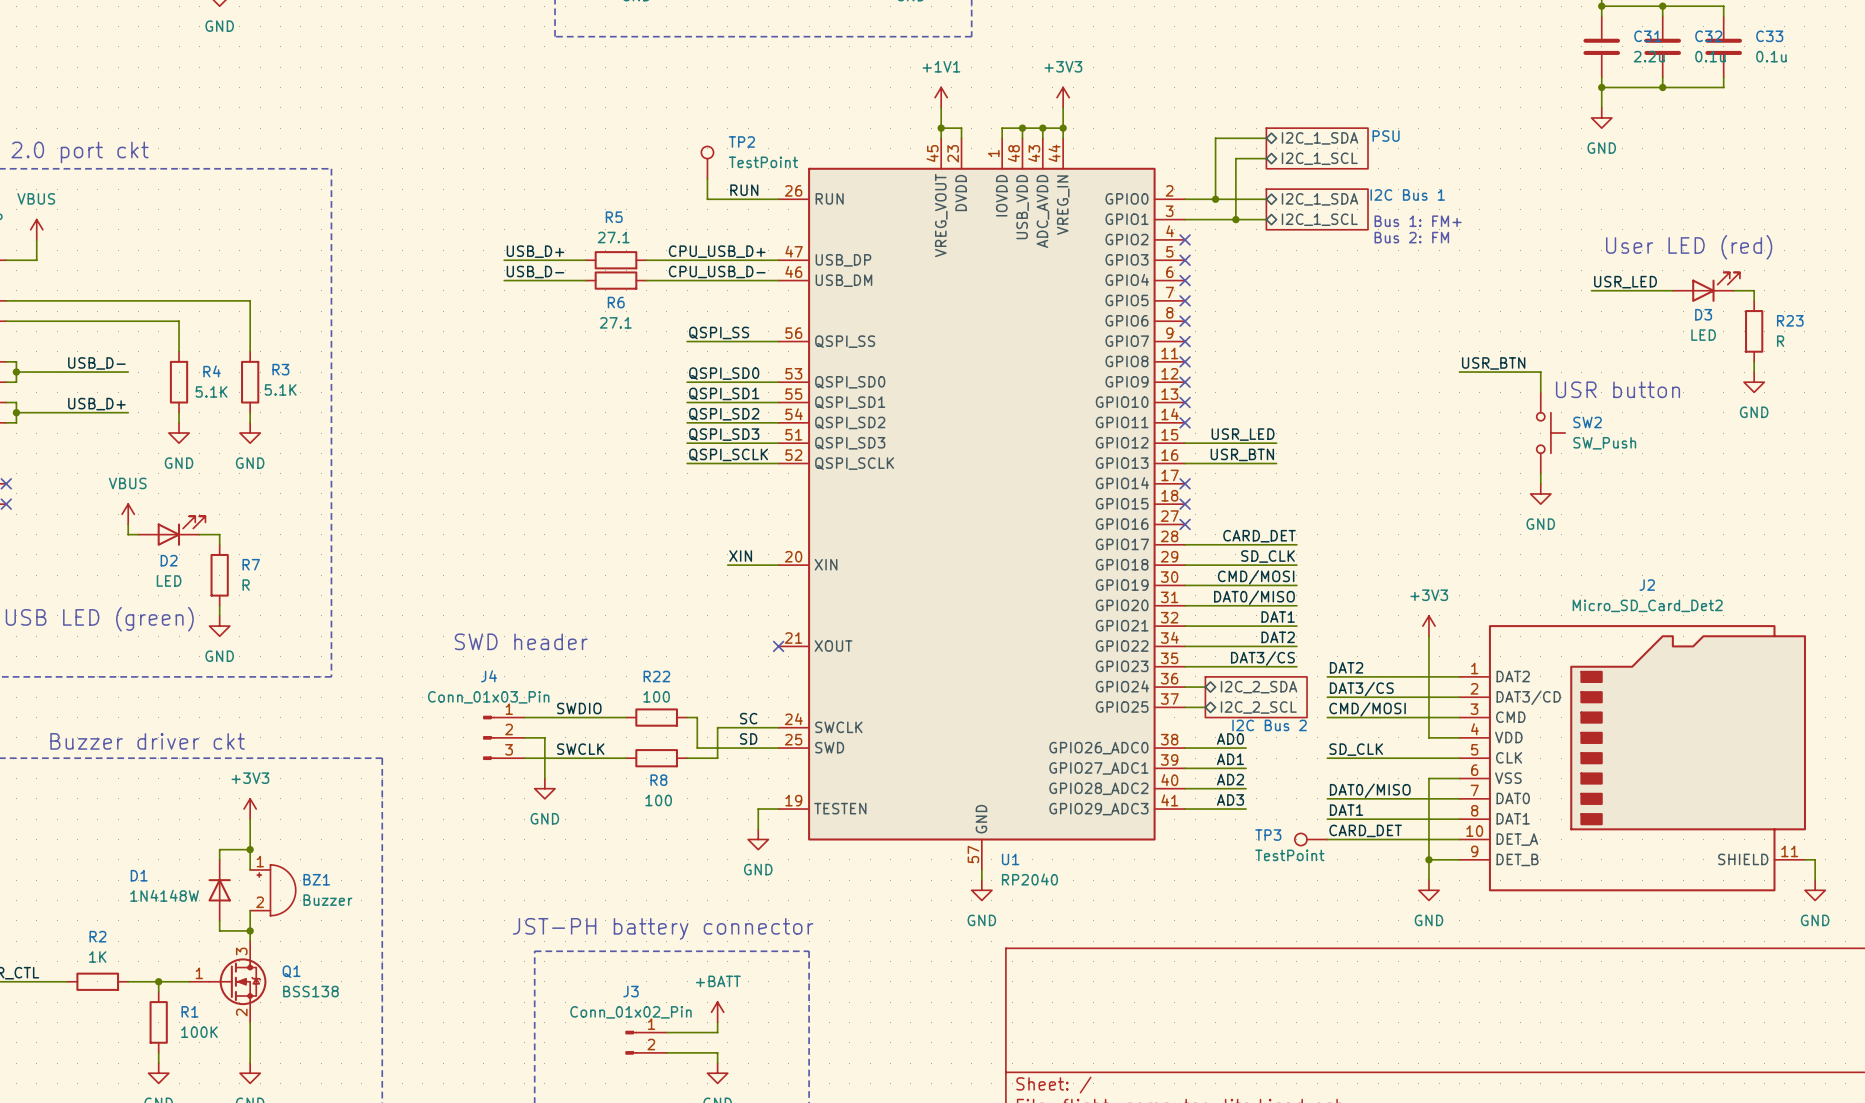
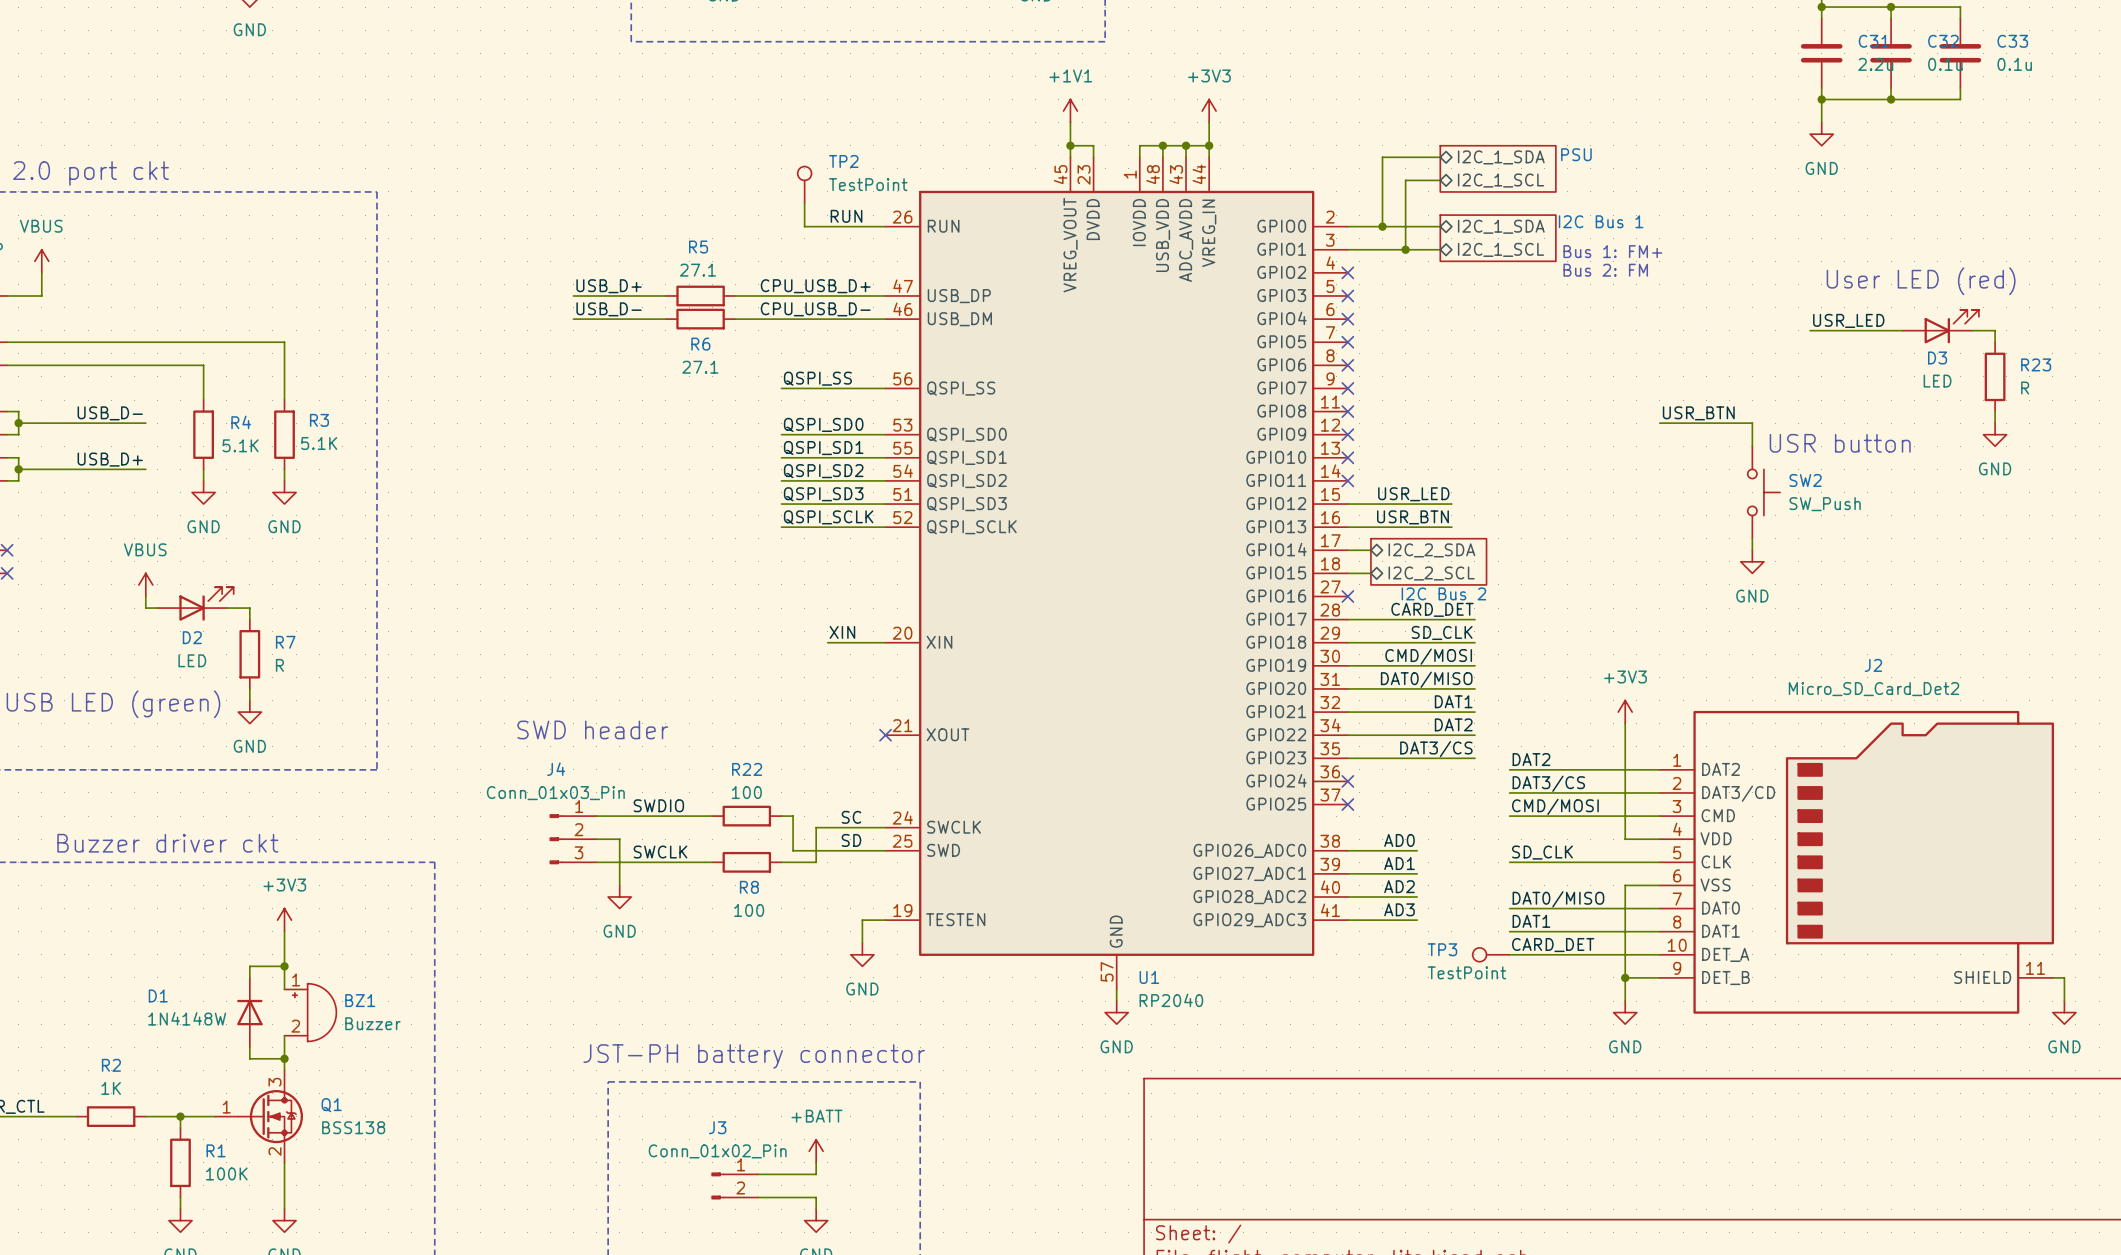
wire: none -> (1347, 550) (1370, 550)
no-connect mark: (1185, 483) -> none
sheet pin: none -> I2C_2_SDA (1431, 550)
no-connect mark: (1185, 504) -> none
sheet pin: none -> I2C_2_SCL (1431, 573)
wire: (1185, 687) (1205, 687) -> (1347, 573) (1370, 573)
no-connect mark: none -> (1347, 781)
sheet pin: I2C_2_SDA (1259, 687) -> none
sheet I2C Bus 2 position: (1256, 697) -> (1428, 561)
wire: (1185, 707) (1205, 707) -> none
no-connect mark: none -> (1347, 804)
sheet pin: I2C_2_SCL (1258, 707) -> none

